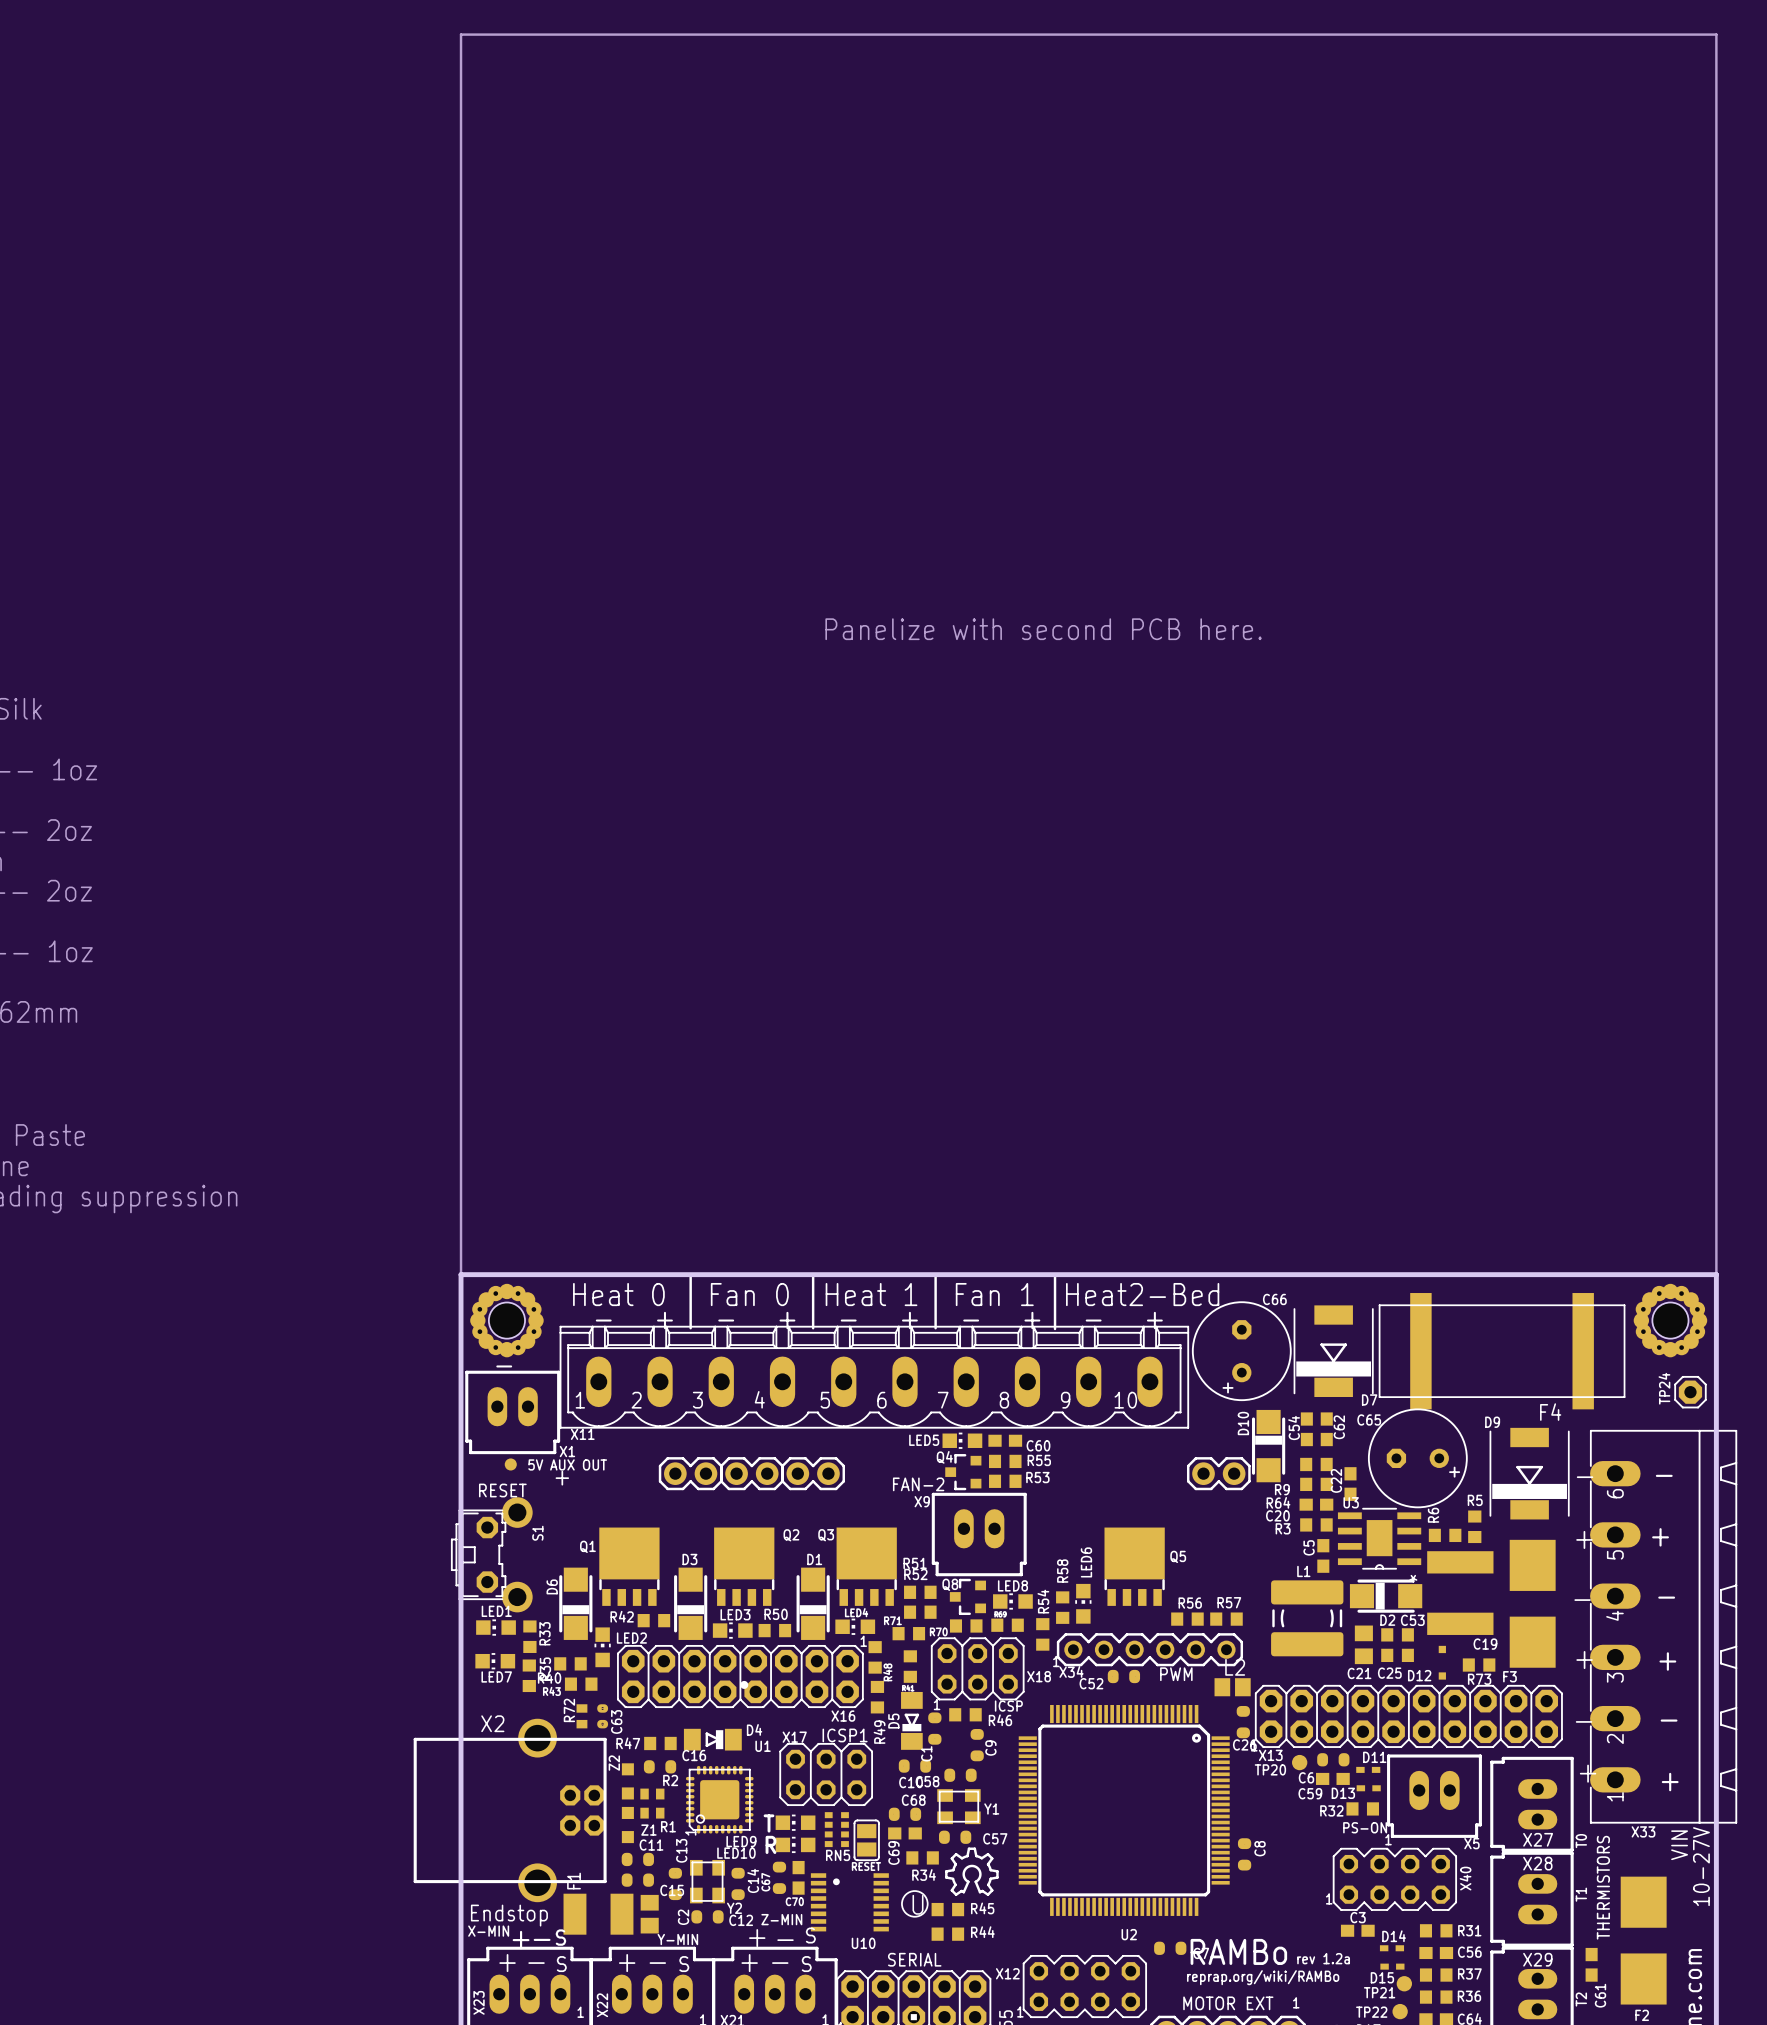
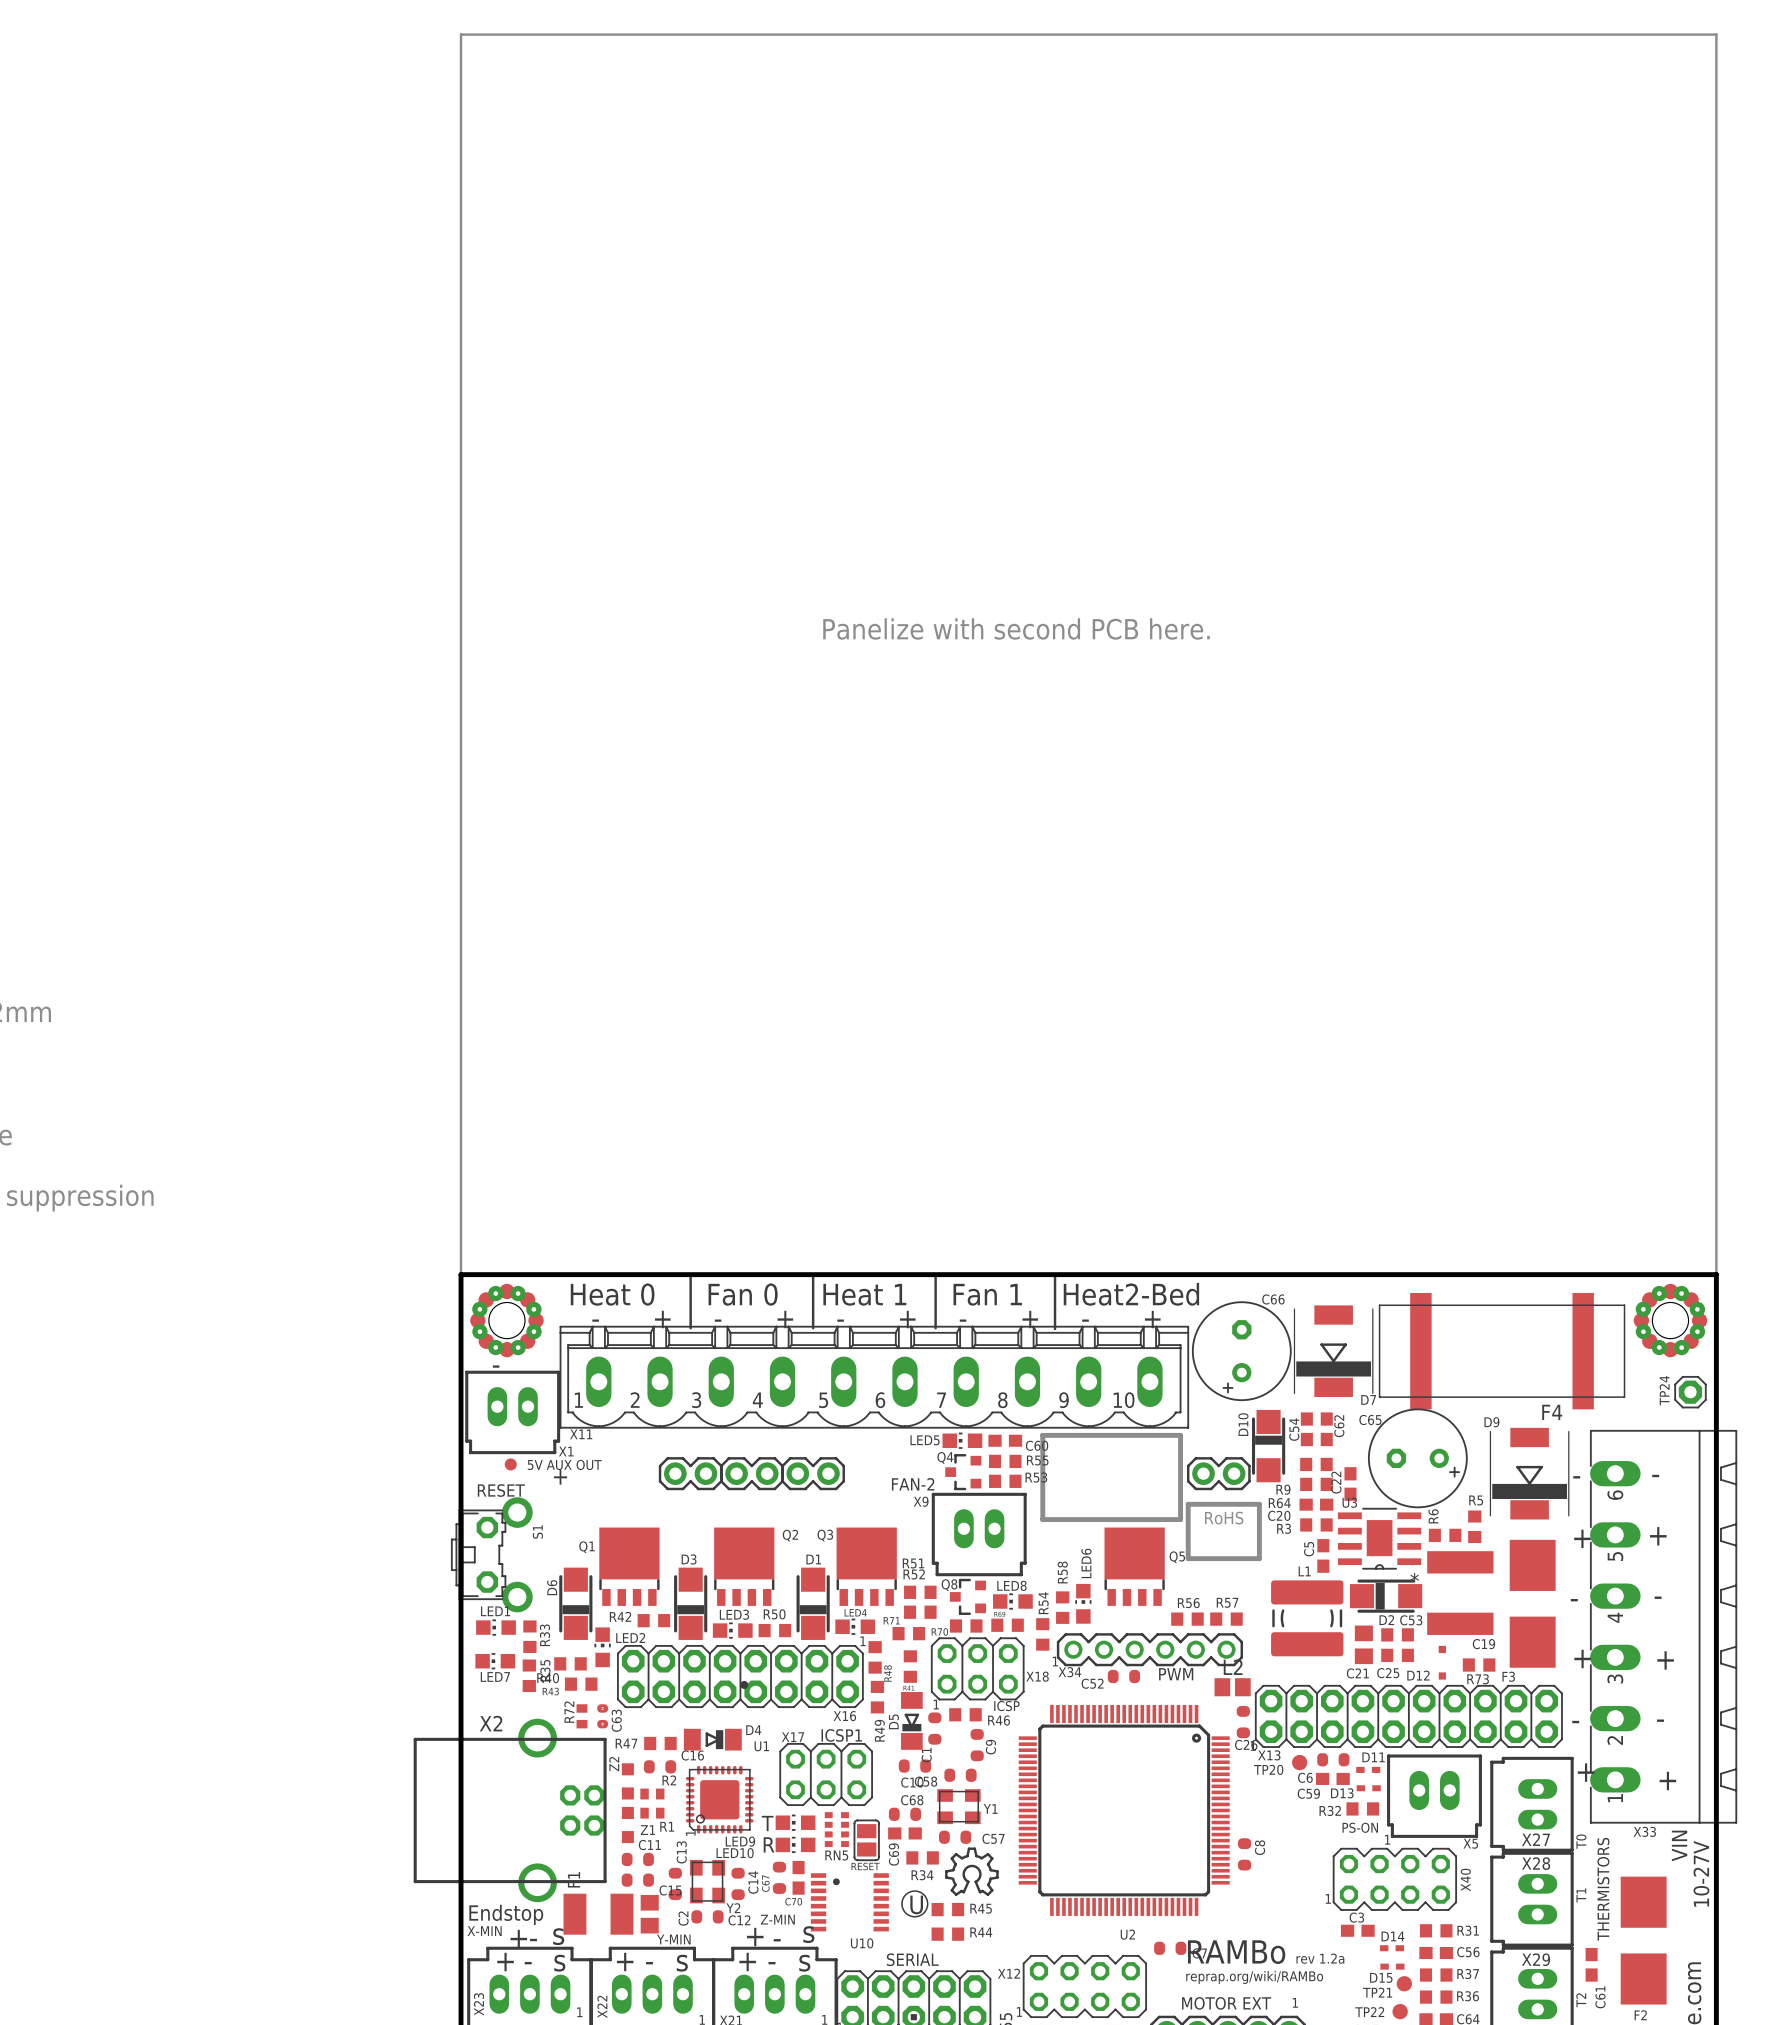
line: none -> (1042, 1435) (1180, 1435) (1180, 1519) (1042, 1519) (1042, 1435)
line: none -> (1188, 1504) (1259, 1504) (1259, 1558) (1188, 1558) (1188, 1504)
text: none -> RoHS (1224, 1518)

